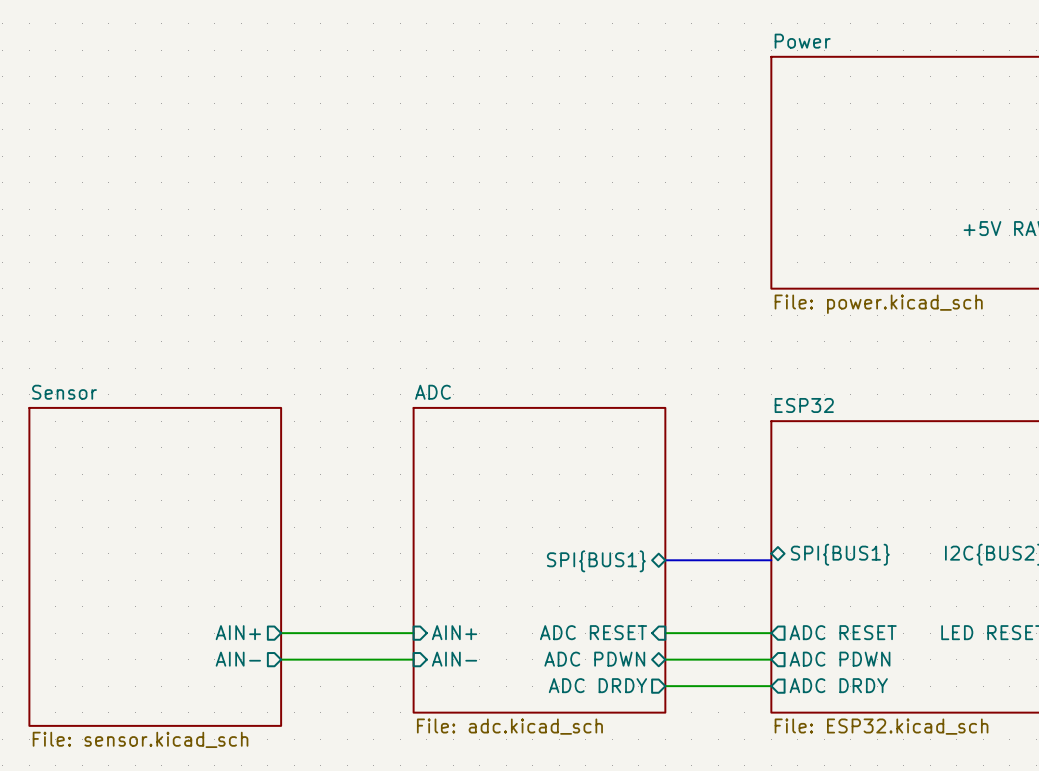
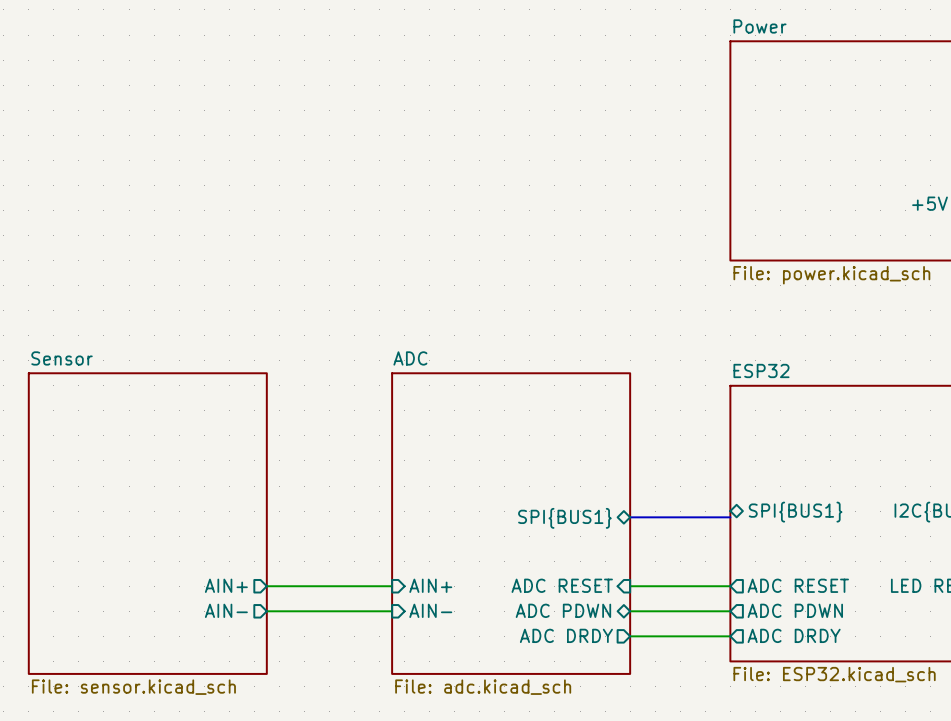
sheet ADC shape: [412, 407, 667, 714] -> [391, 372, 631, 675]

